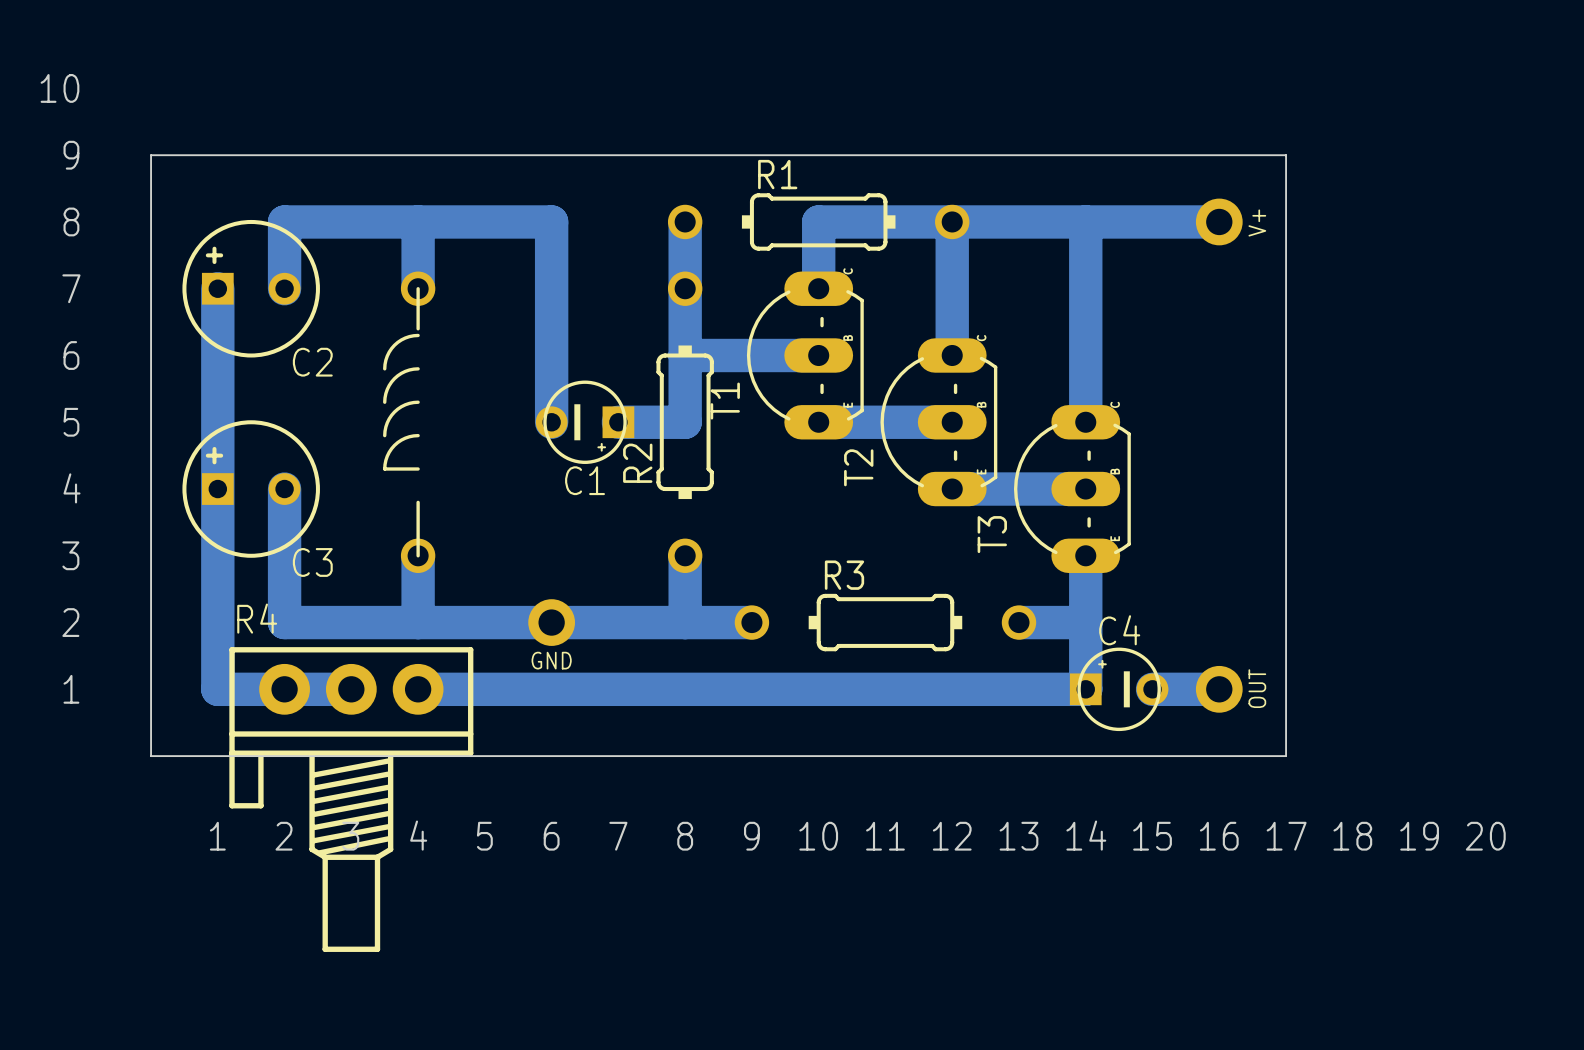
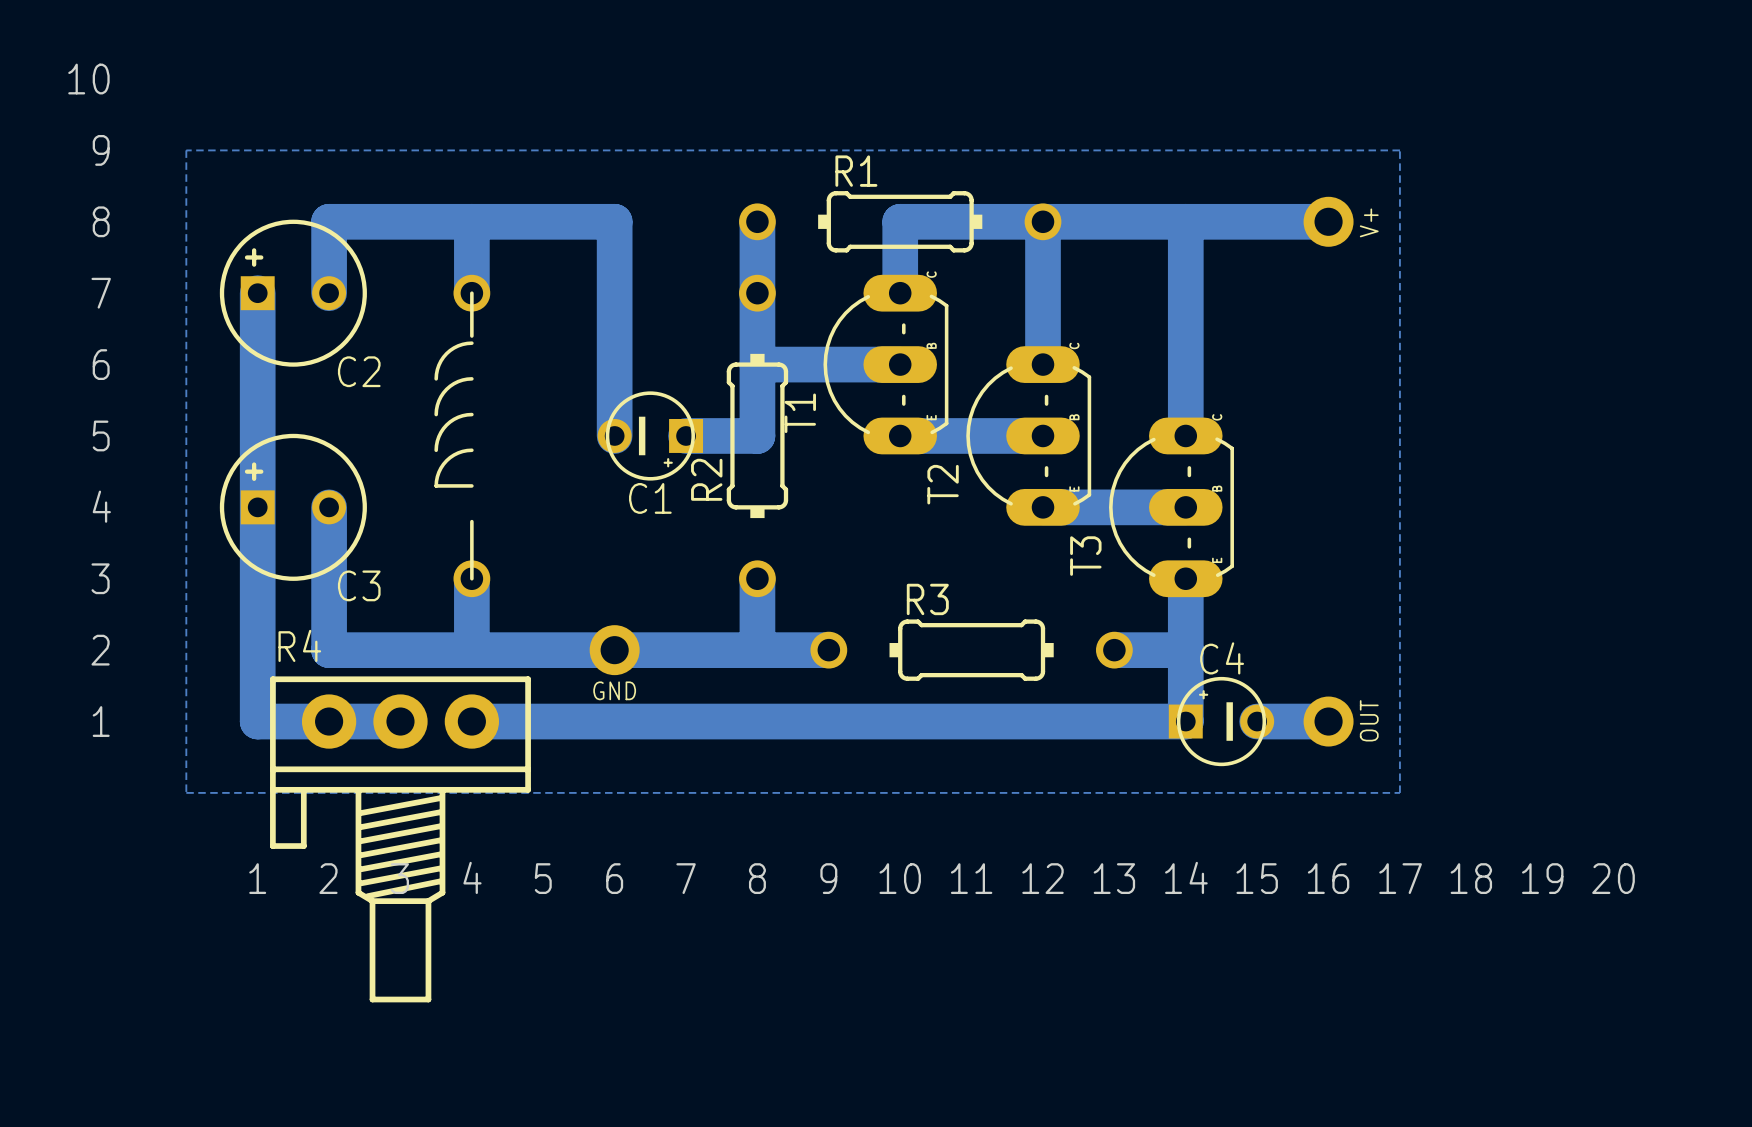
board edge: (151, 155) (1286, 155) (1286, 756) (151, 756) (151, 155) -> none
bottom zone outline: none -> (186, 150) (186, 792) (1399, 792) (1399, 150) (186, 150)

